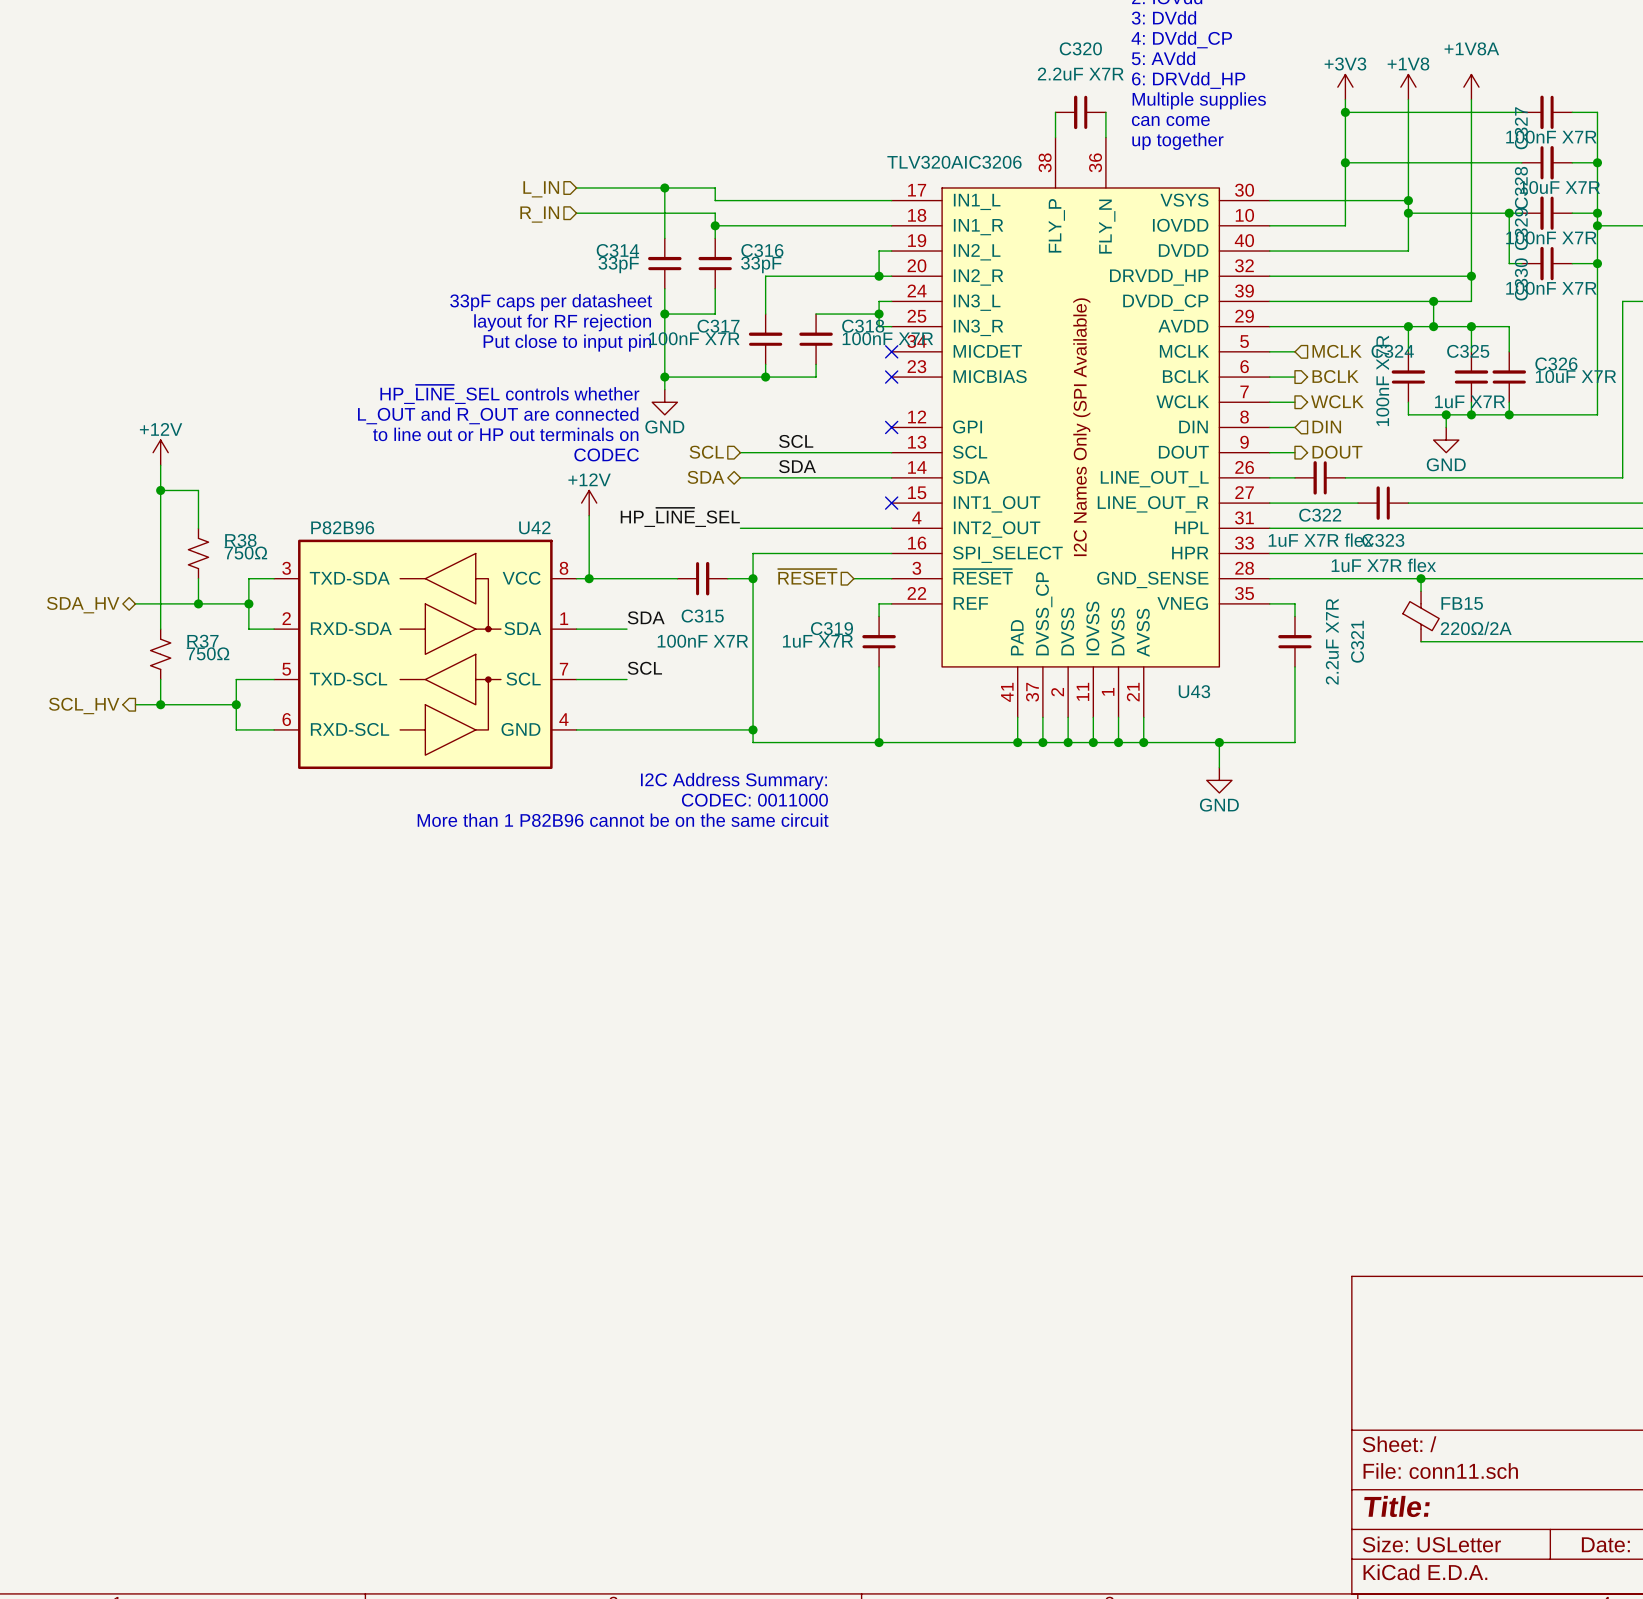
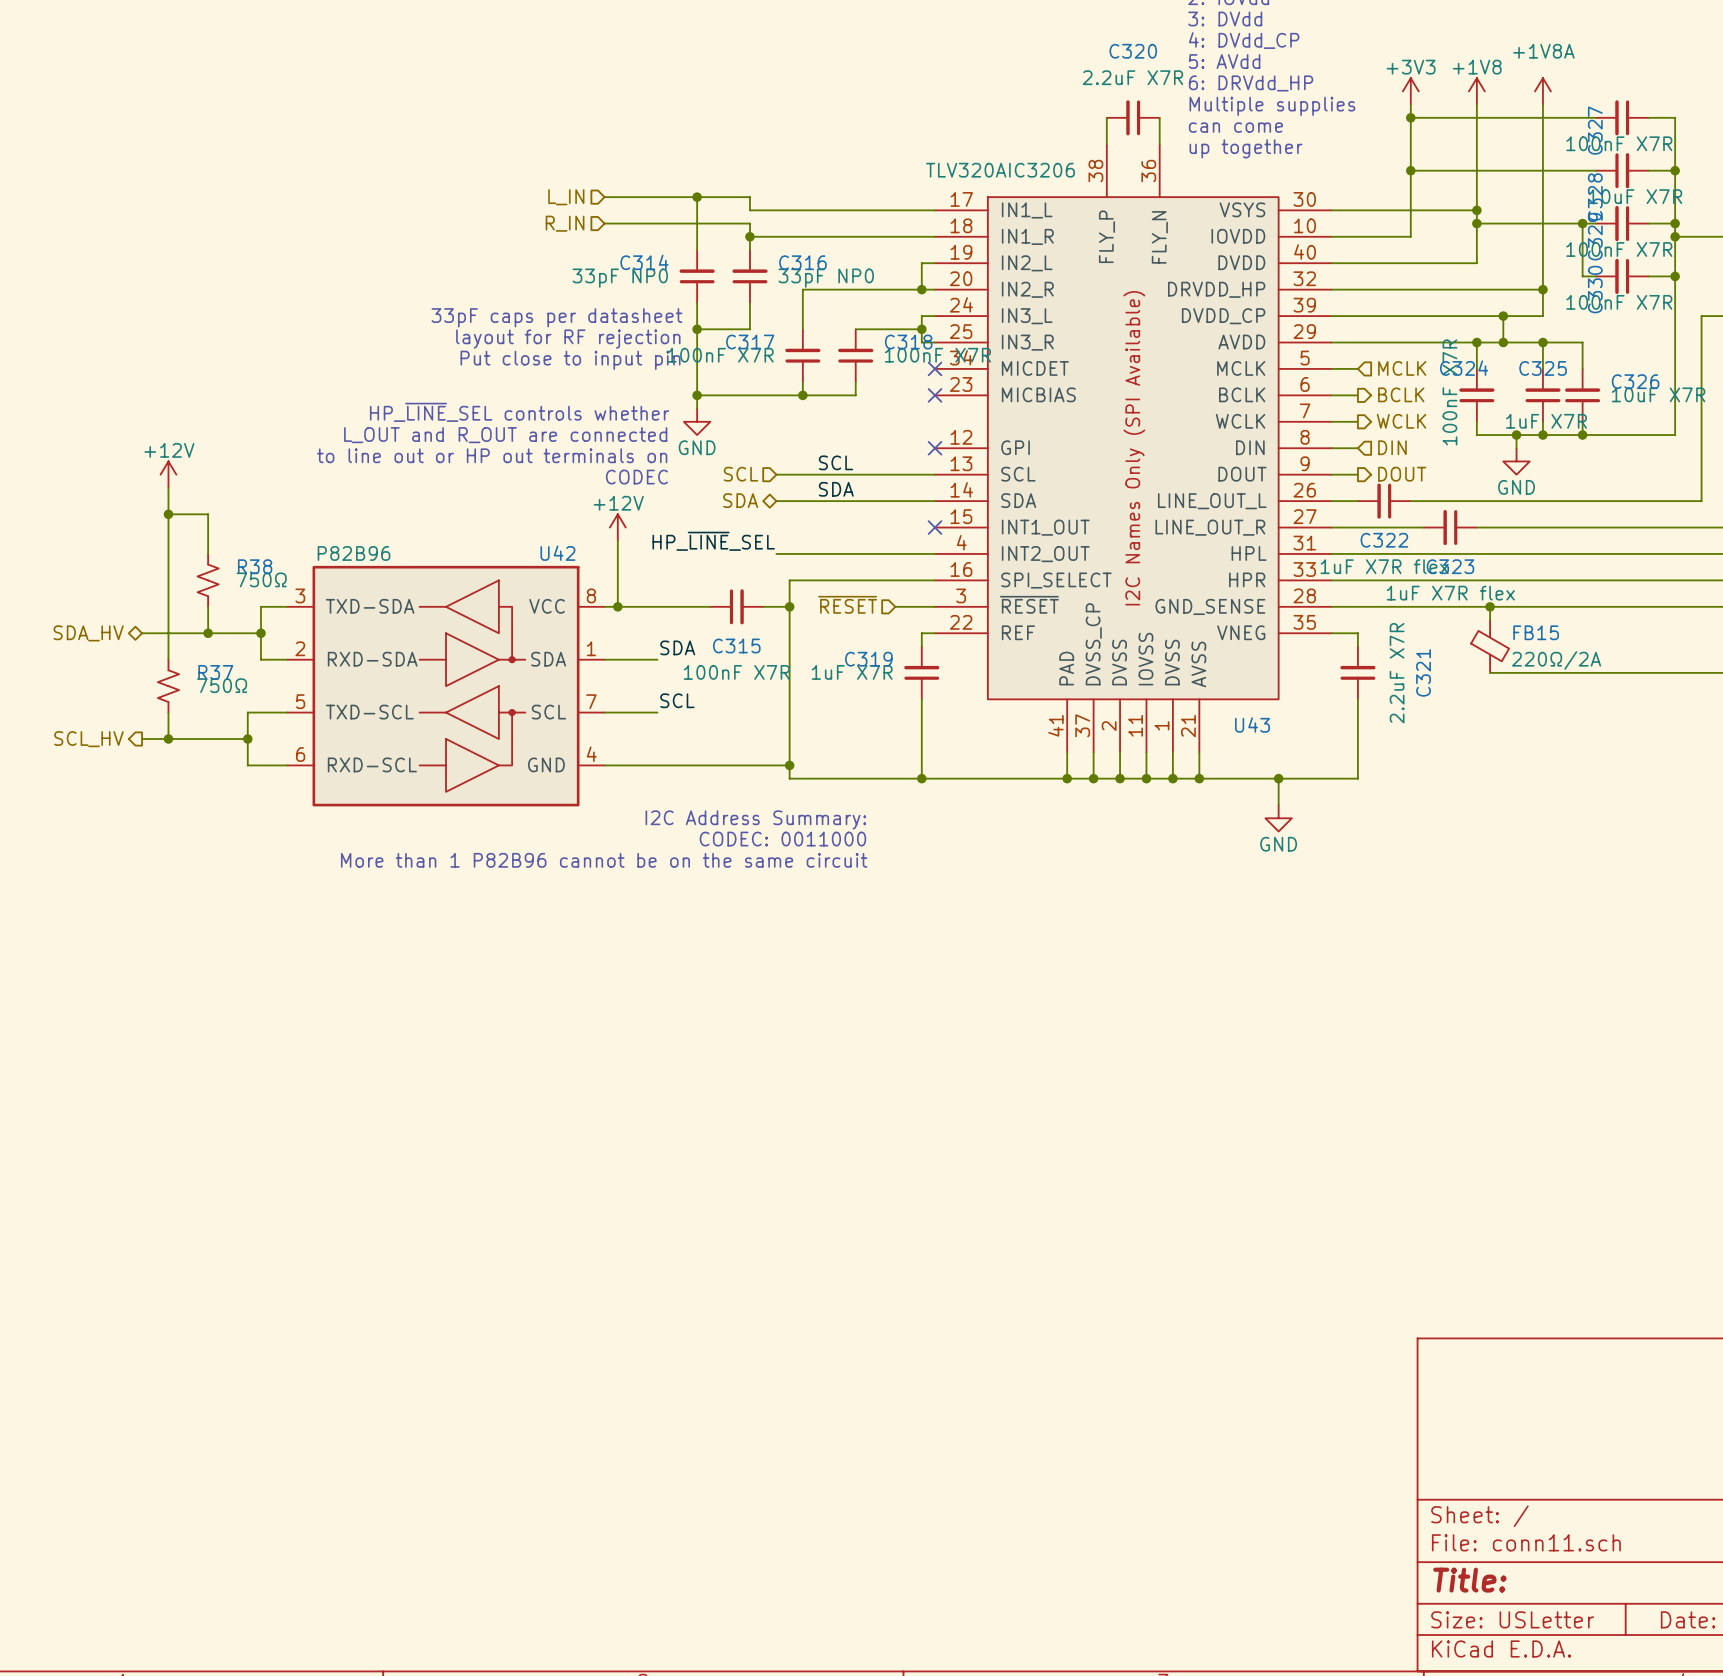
C314 value: 33pF (618, 264) -> 33pF NP0 (620, 278)
C316 value: 33pF (761, 264) -> 33pF NP0 (826, 278)

